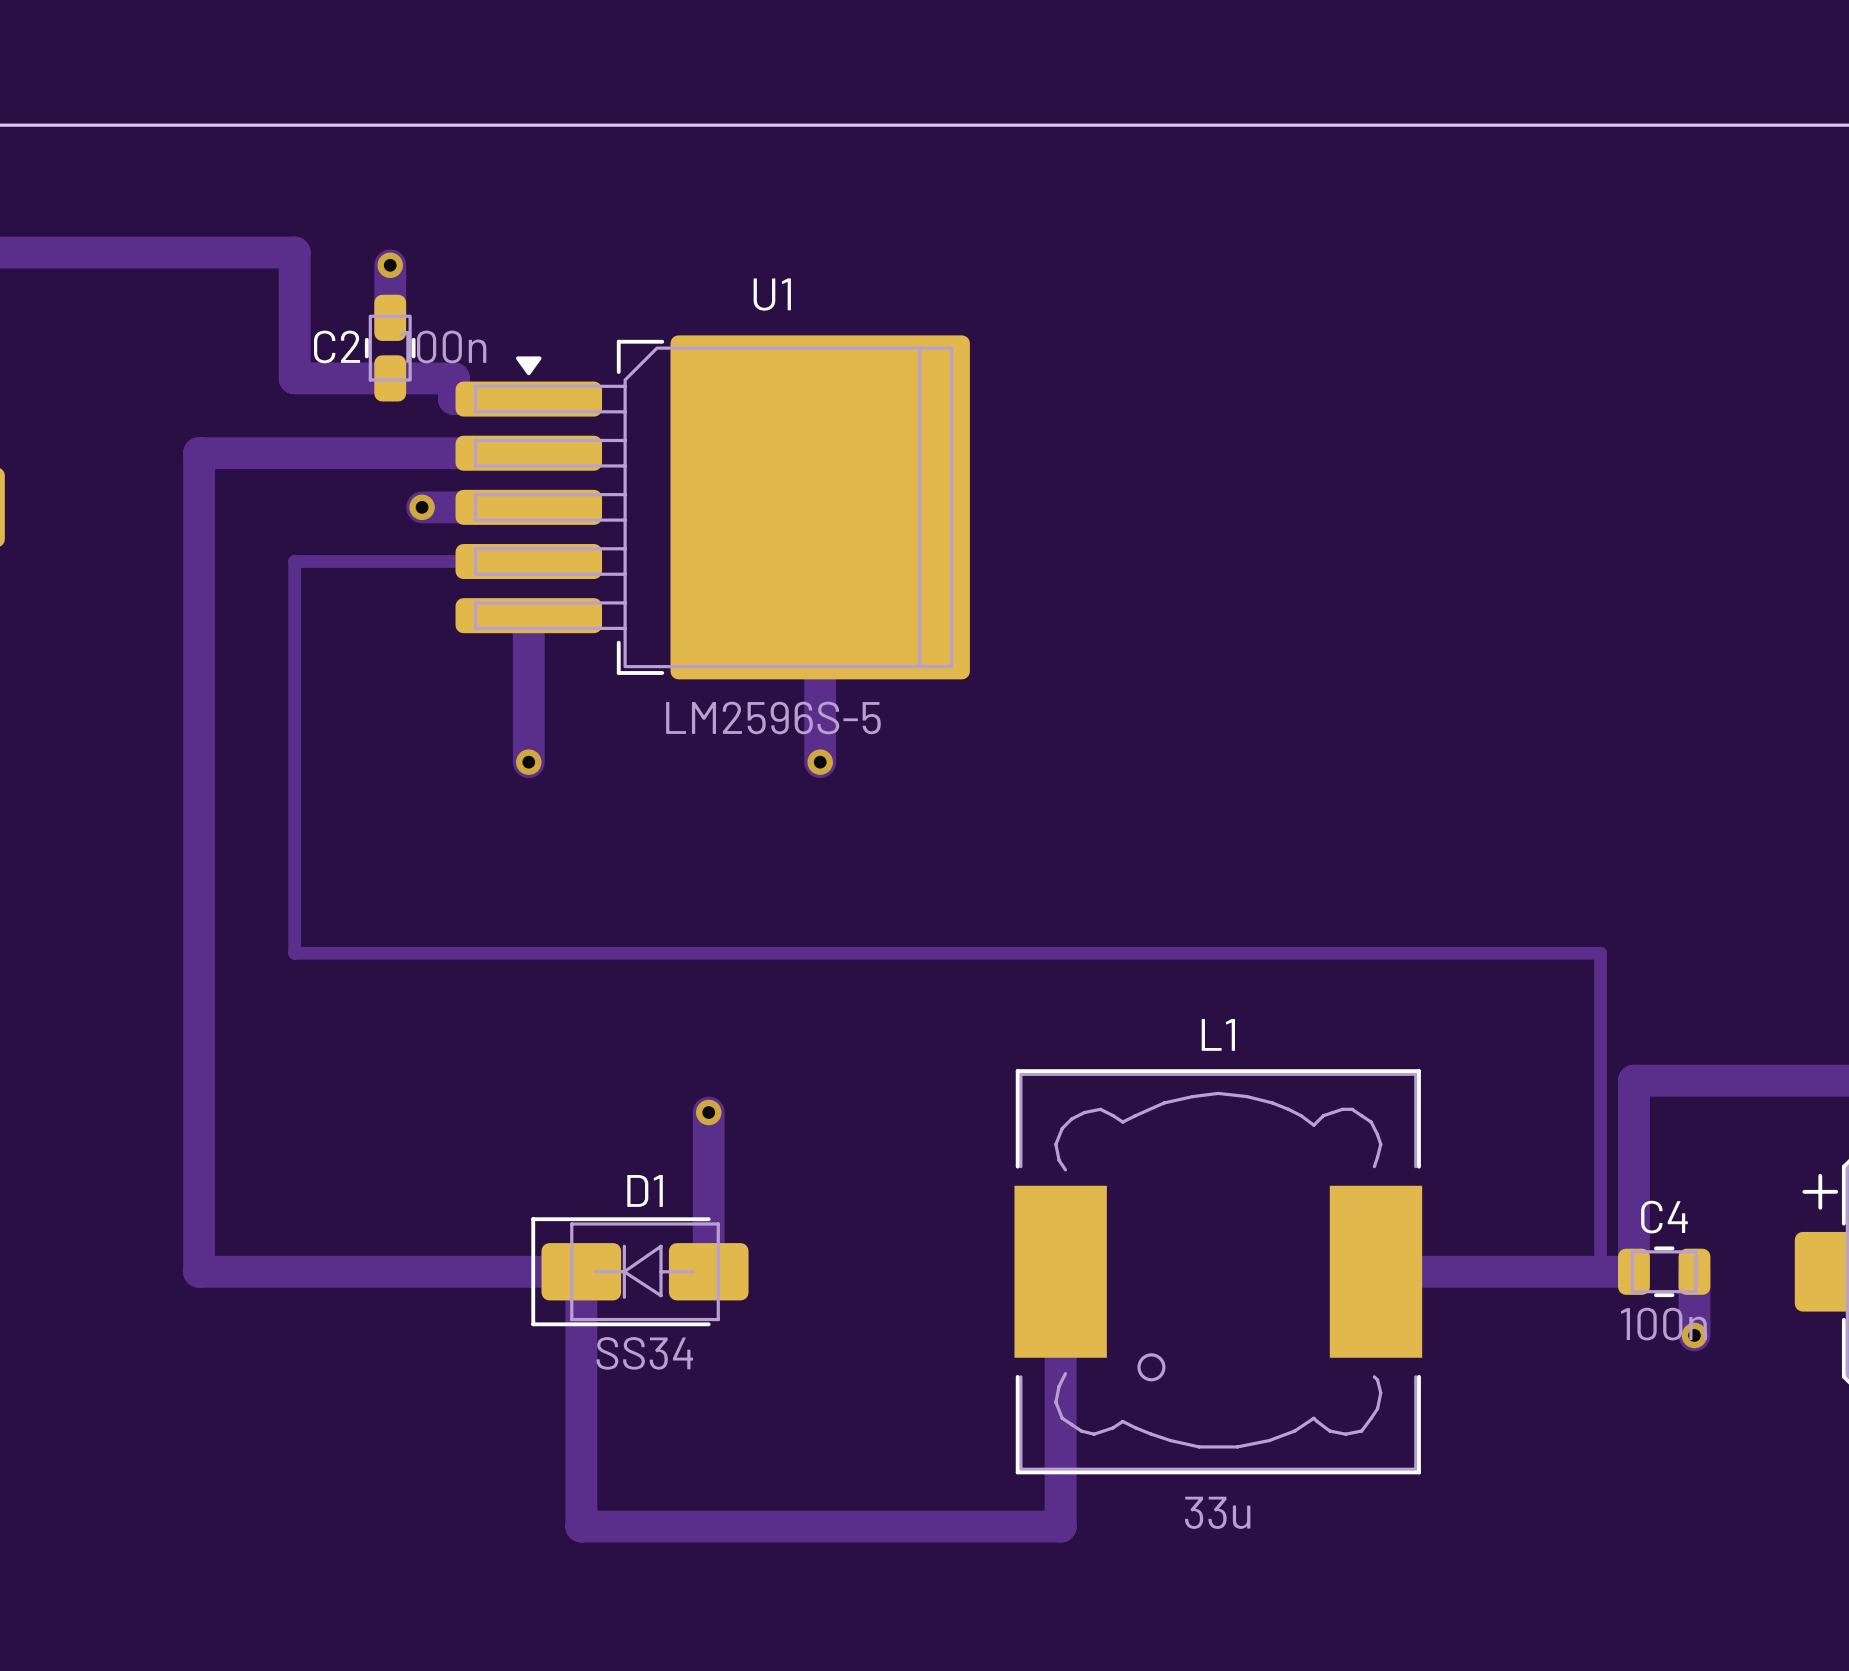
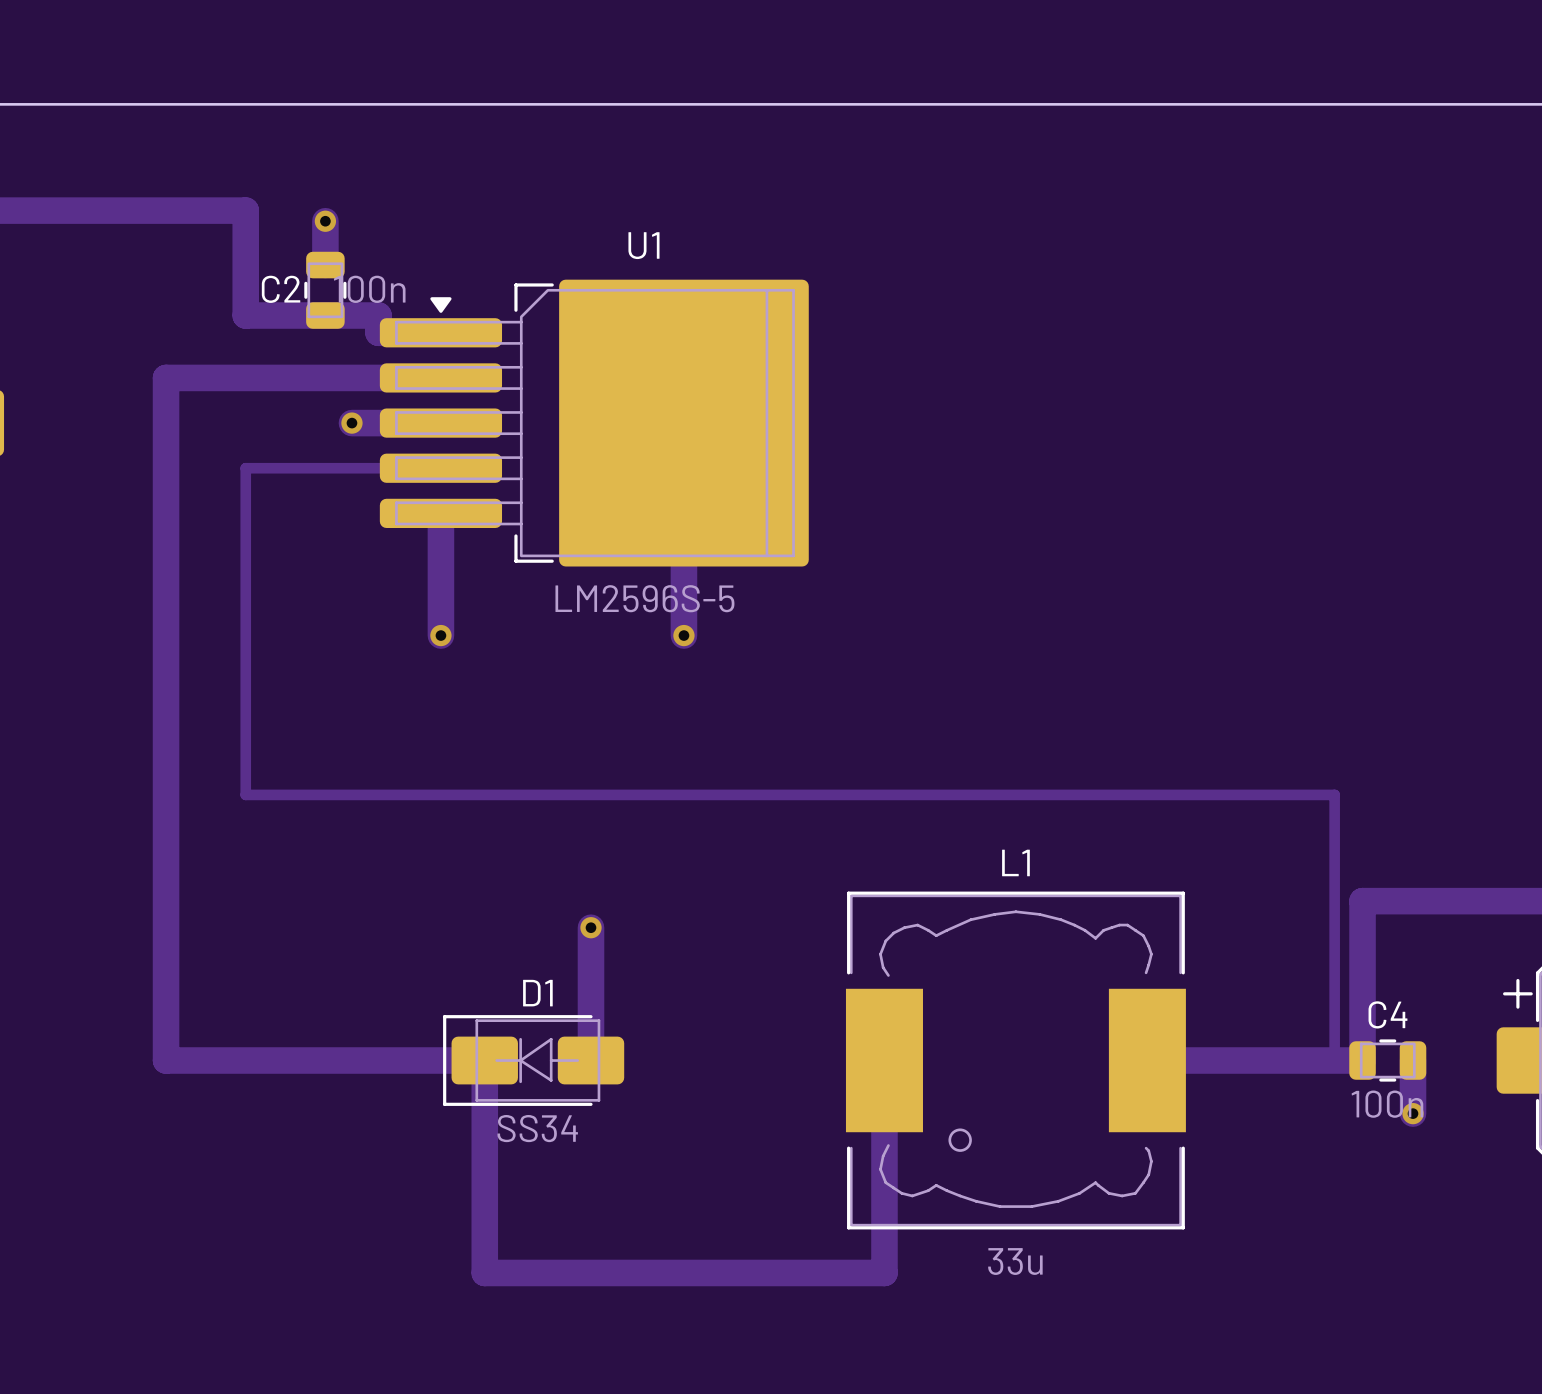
C2 footprint: [364, 294, 416, 402] -> [304, 251, 347, 329]

